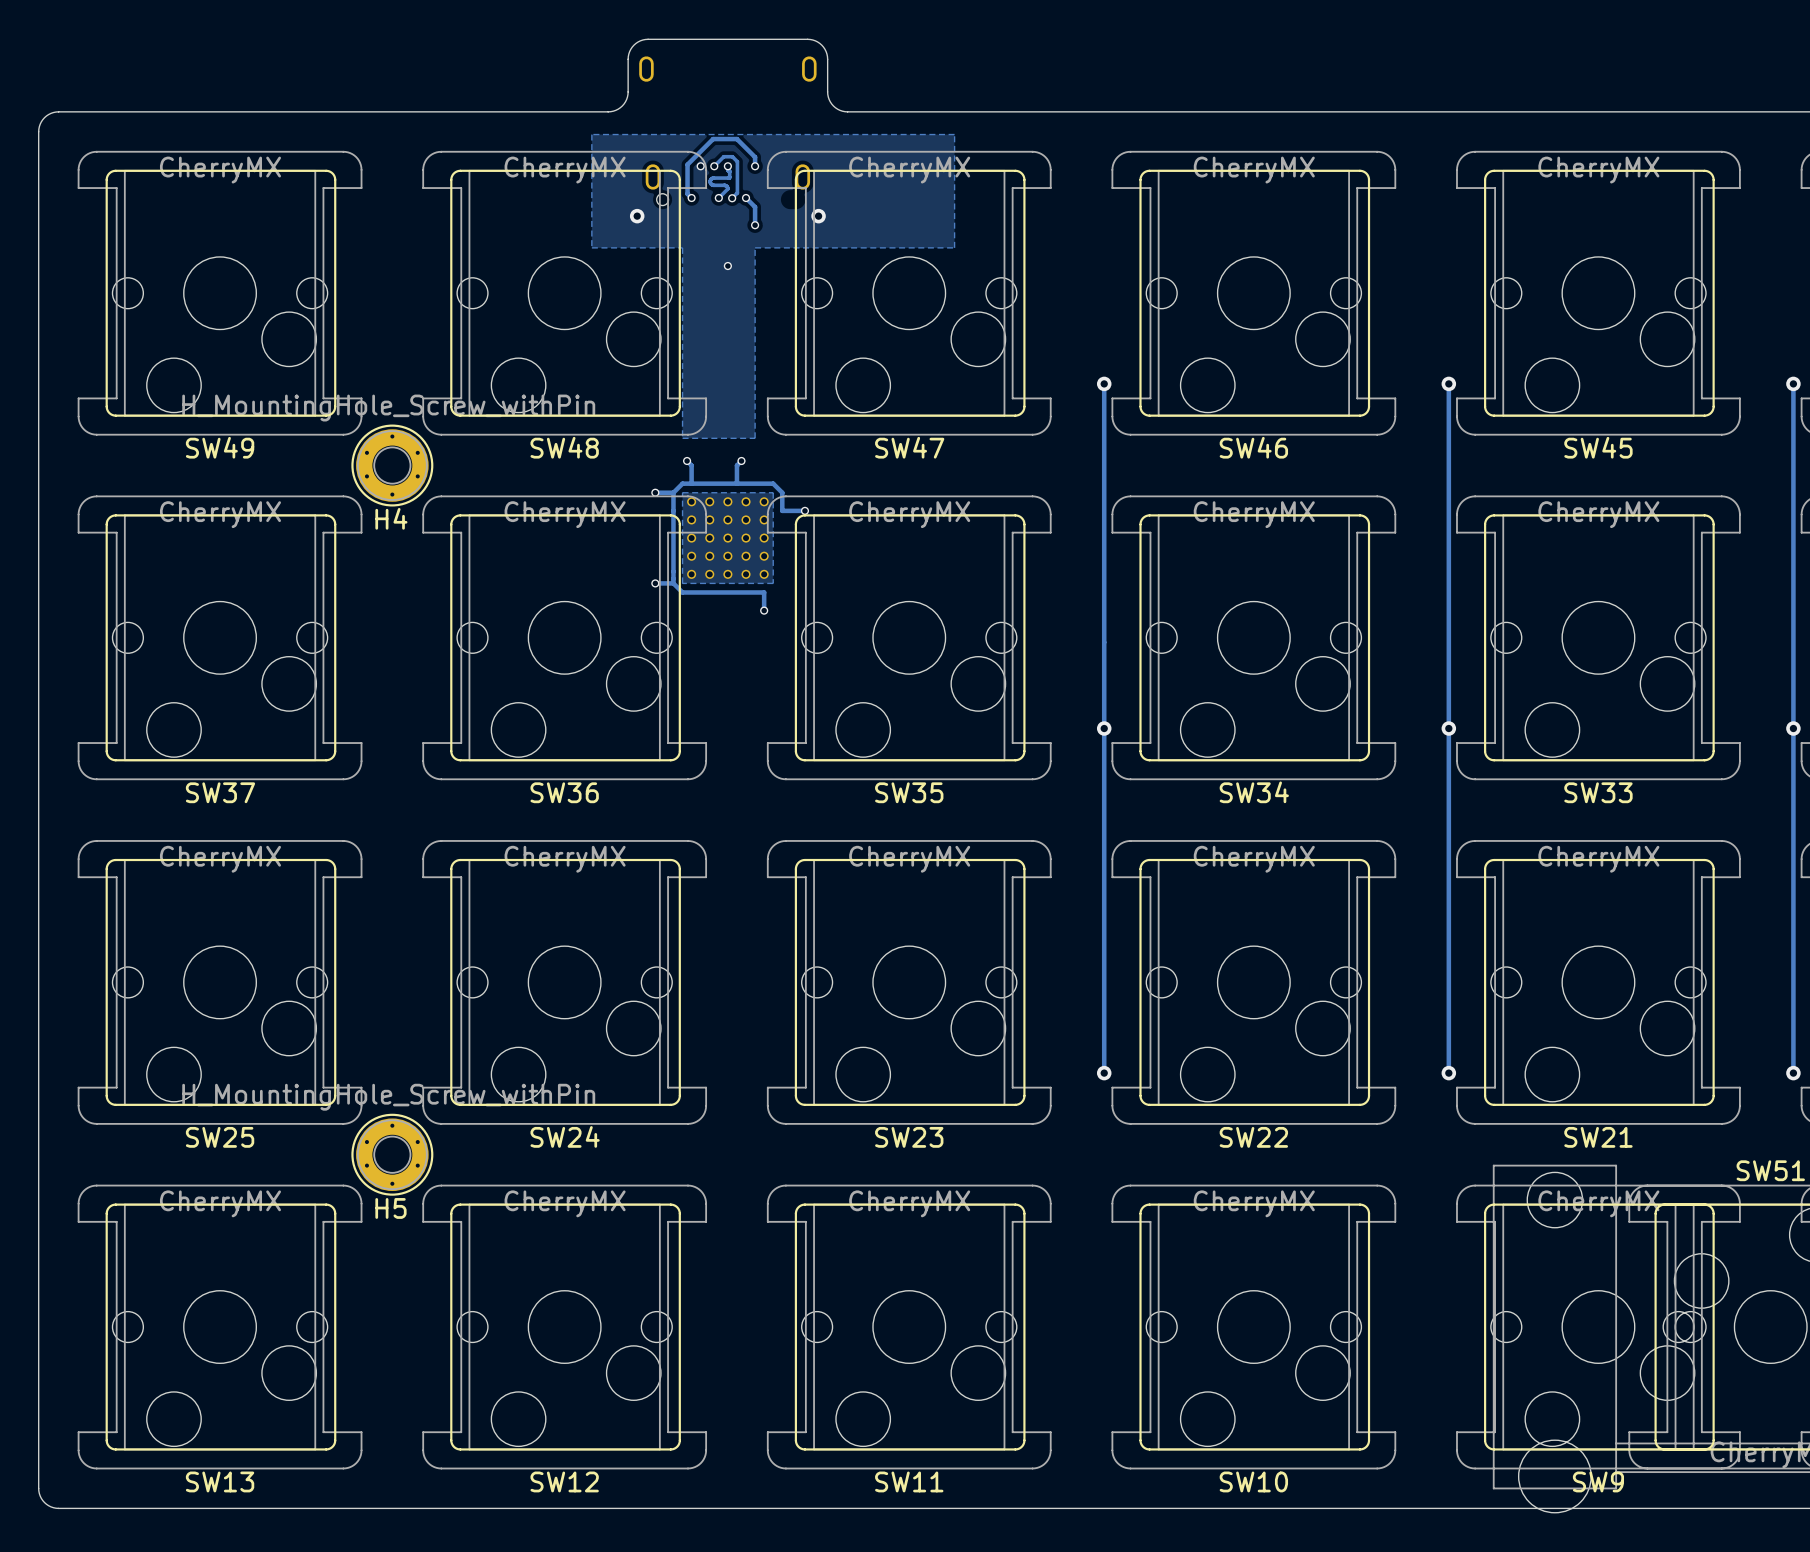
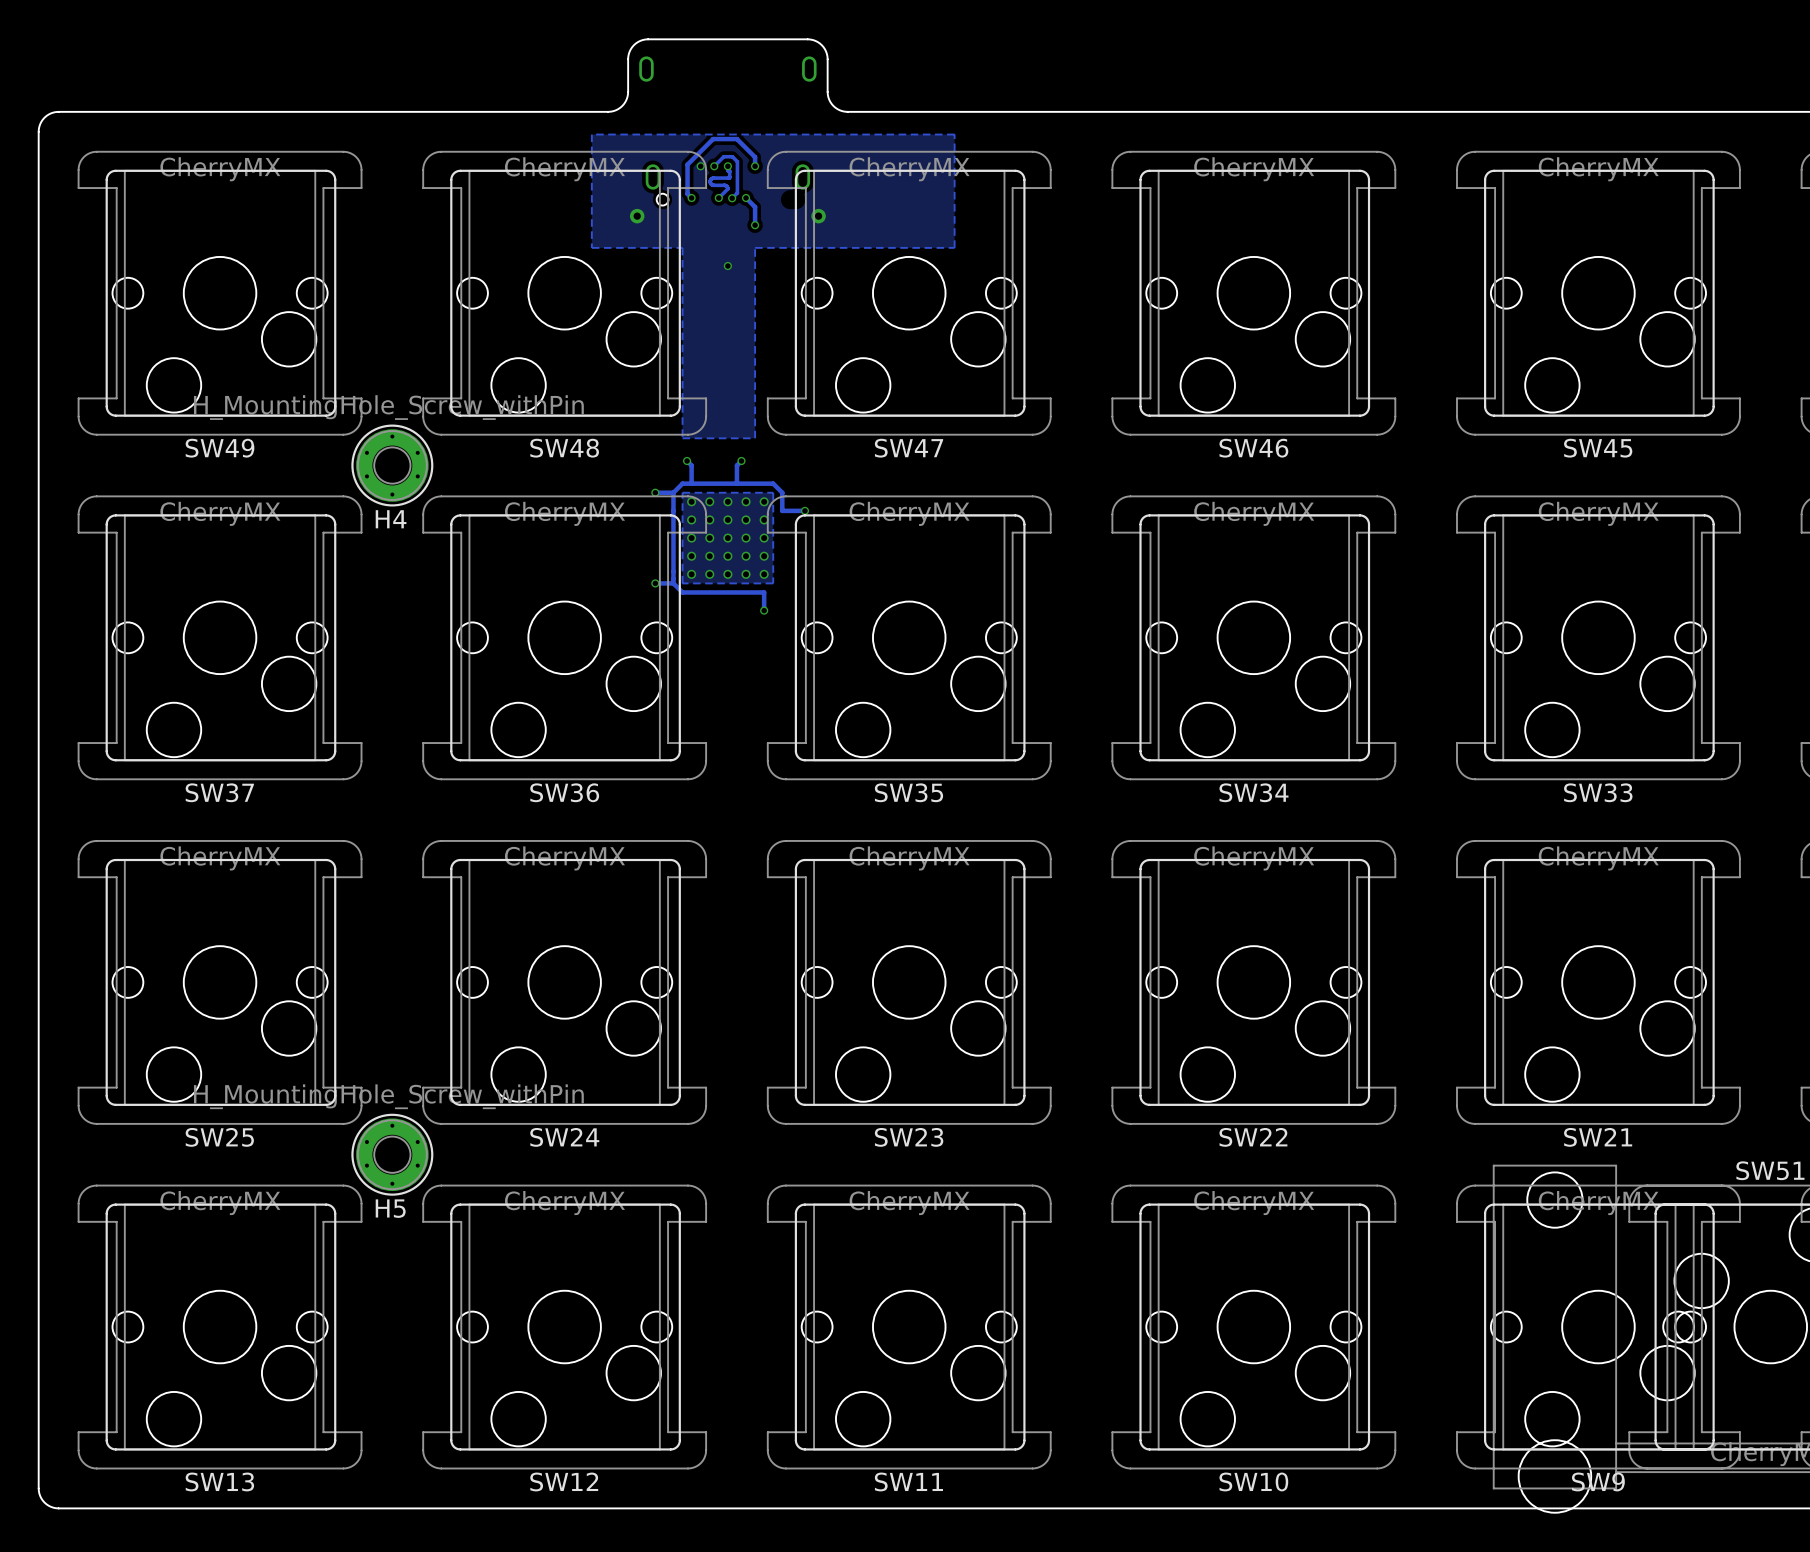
track: (1104, 383) (1104, 1073) -> none
via: (1104, 383) -> none
track: (1448, 383) (1448, 1073) -> none
via: (1448, 383) -> none
track: (1793, 383) (1793, 1073) -> none
via: (1793, 383) -> none
via: (1104, 728) -> none
via: (1448, 728) -> none
via: (1793, 728) -> none
via: (1104, 1073) -> none
via: (1448, 1073) -> none
via: (1793, 1073) -> none

